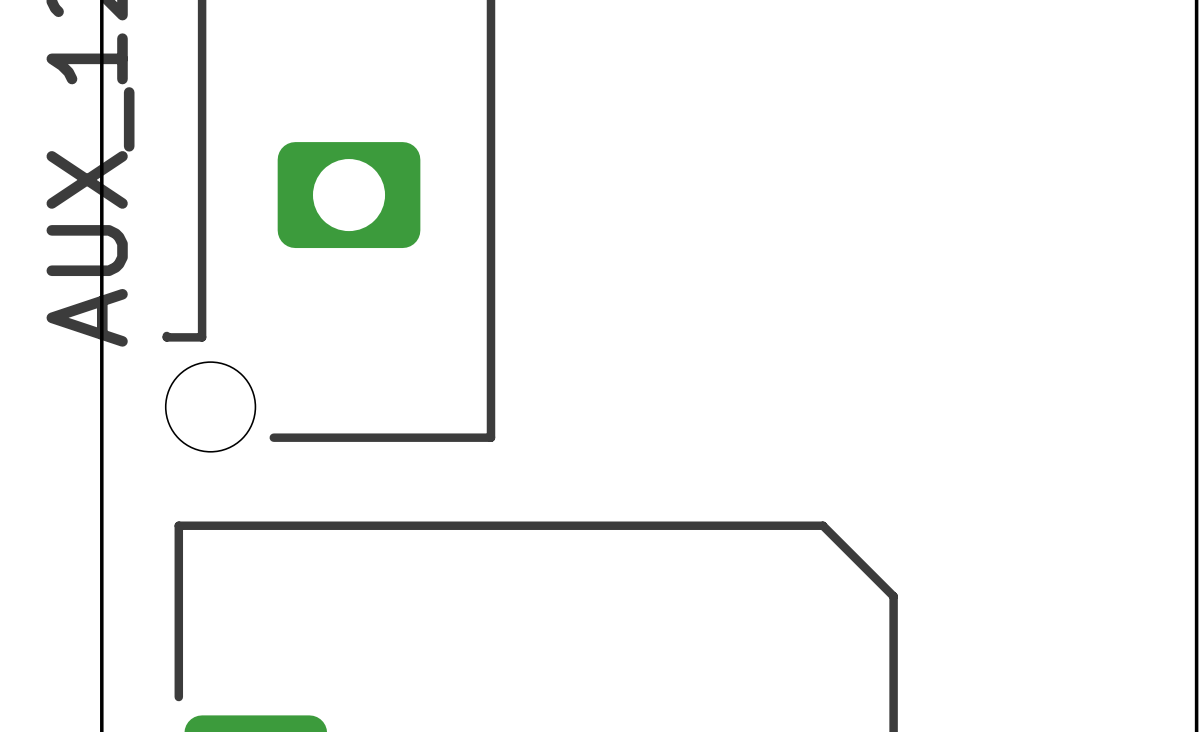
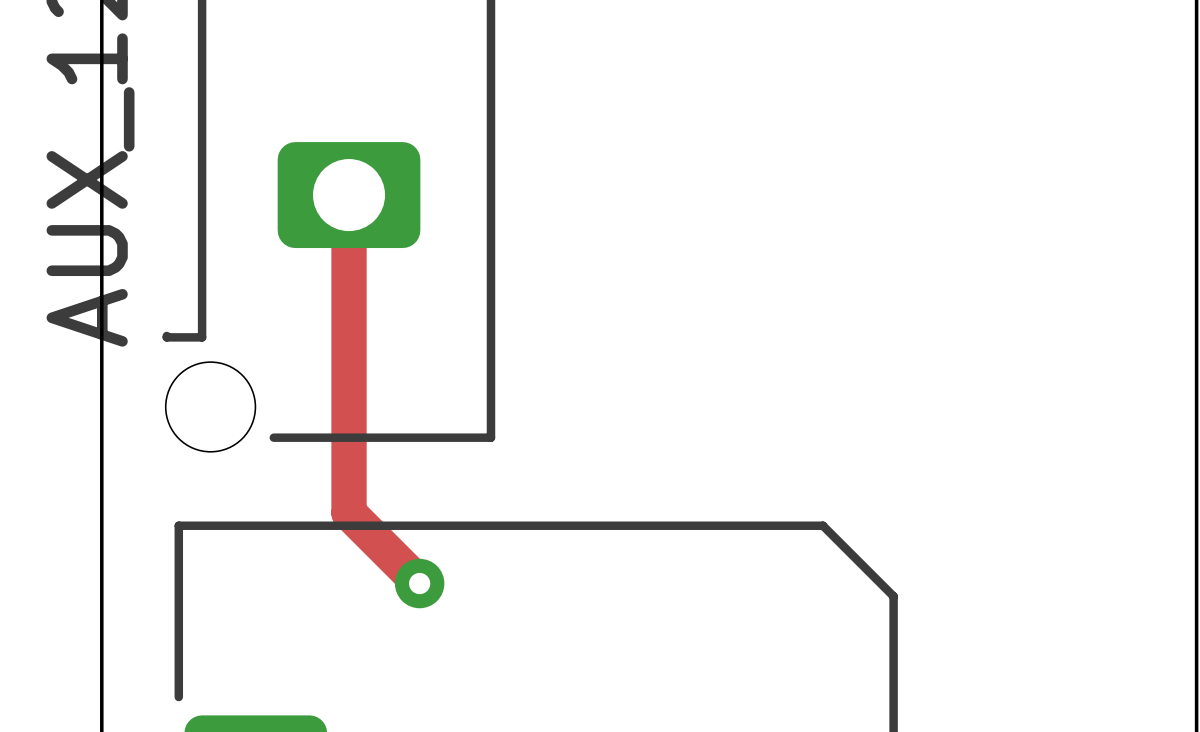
track: none -> (349, 195) (349, 512) (419, 583)
via: none -> (419, 583)

